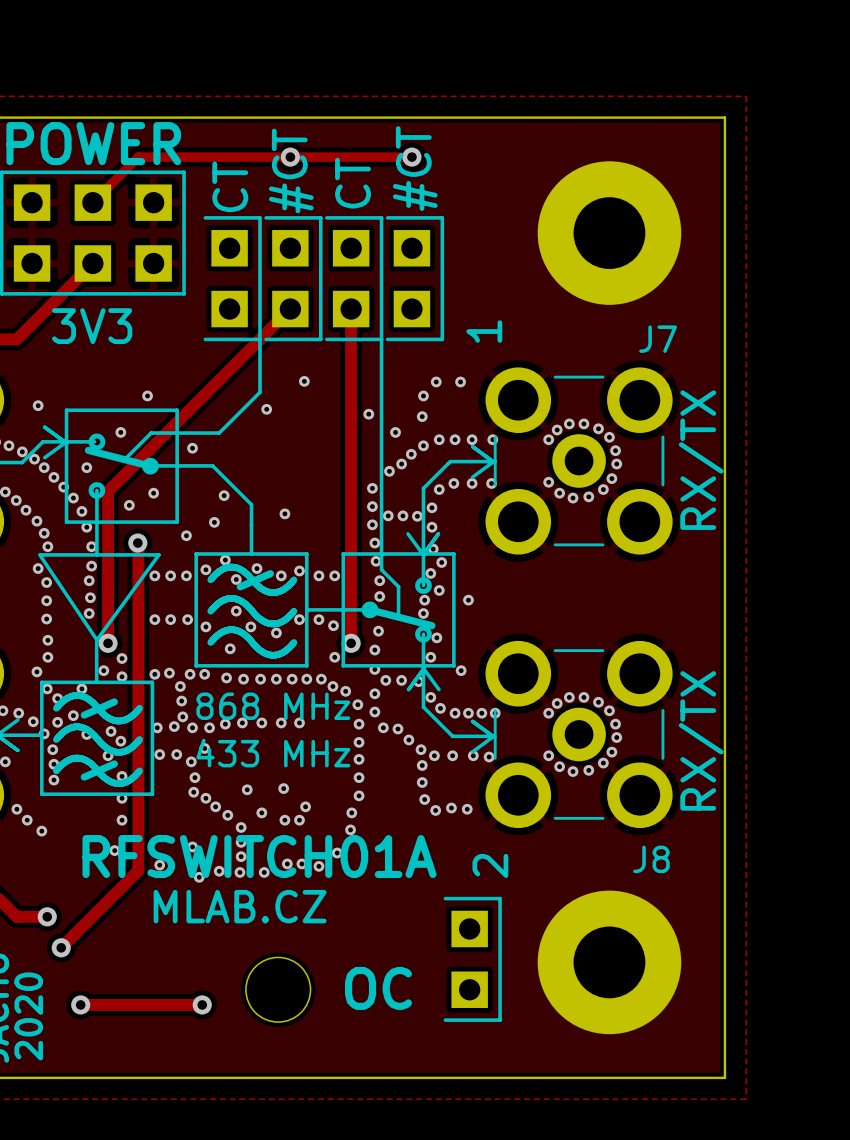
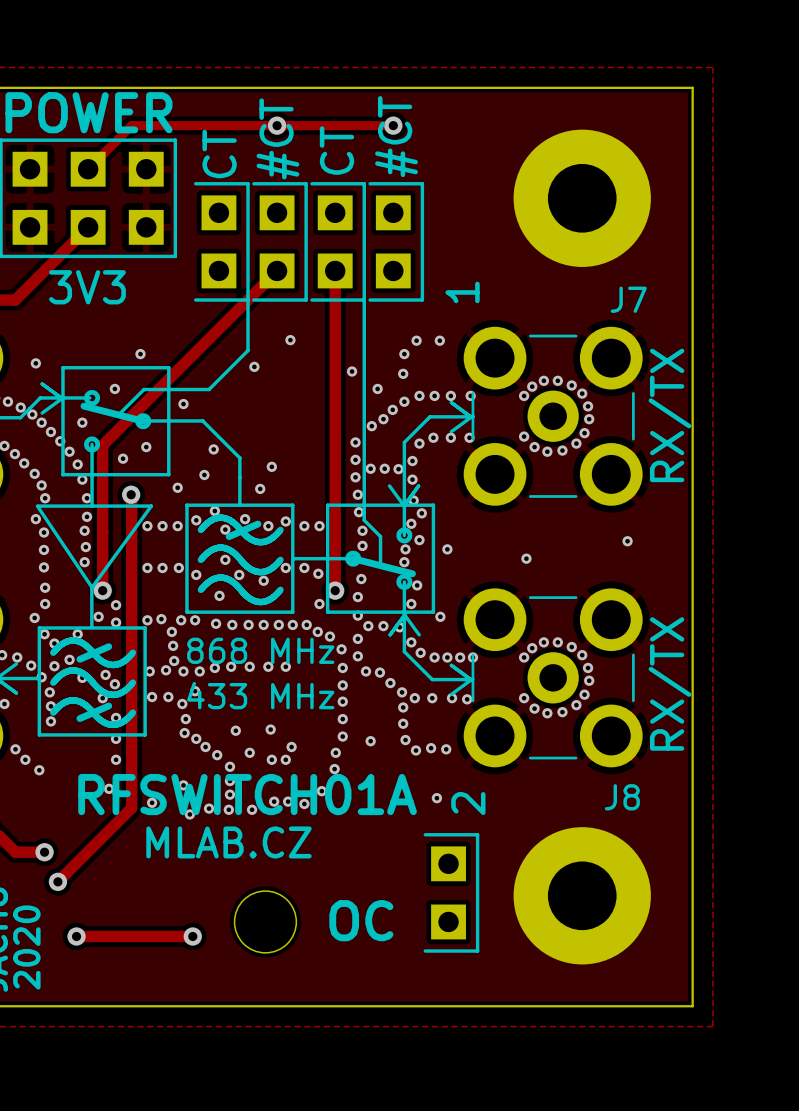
via: none -> (260, 488)
via: none -> (627, 541)
via: none -> (526, 558)
via: none -> (370, 741)
via: none -> (436, 798)

